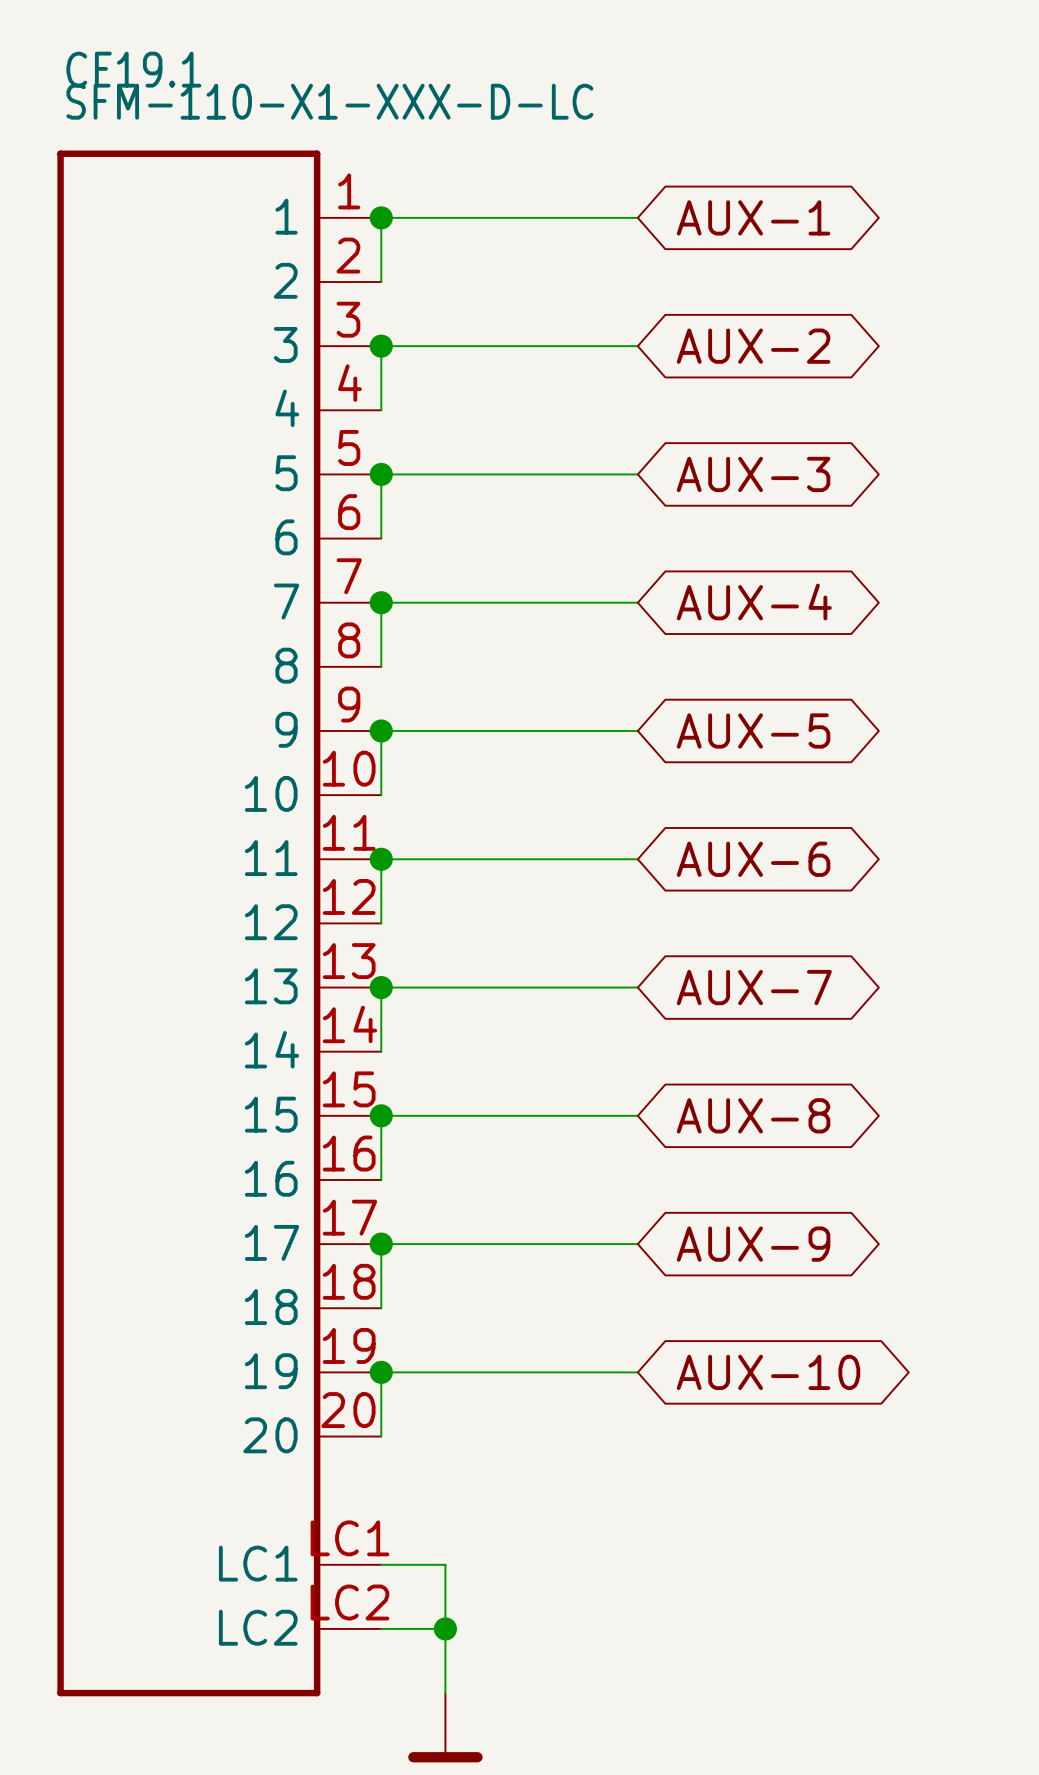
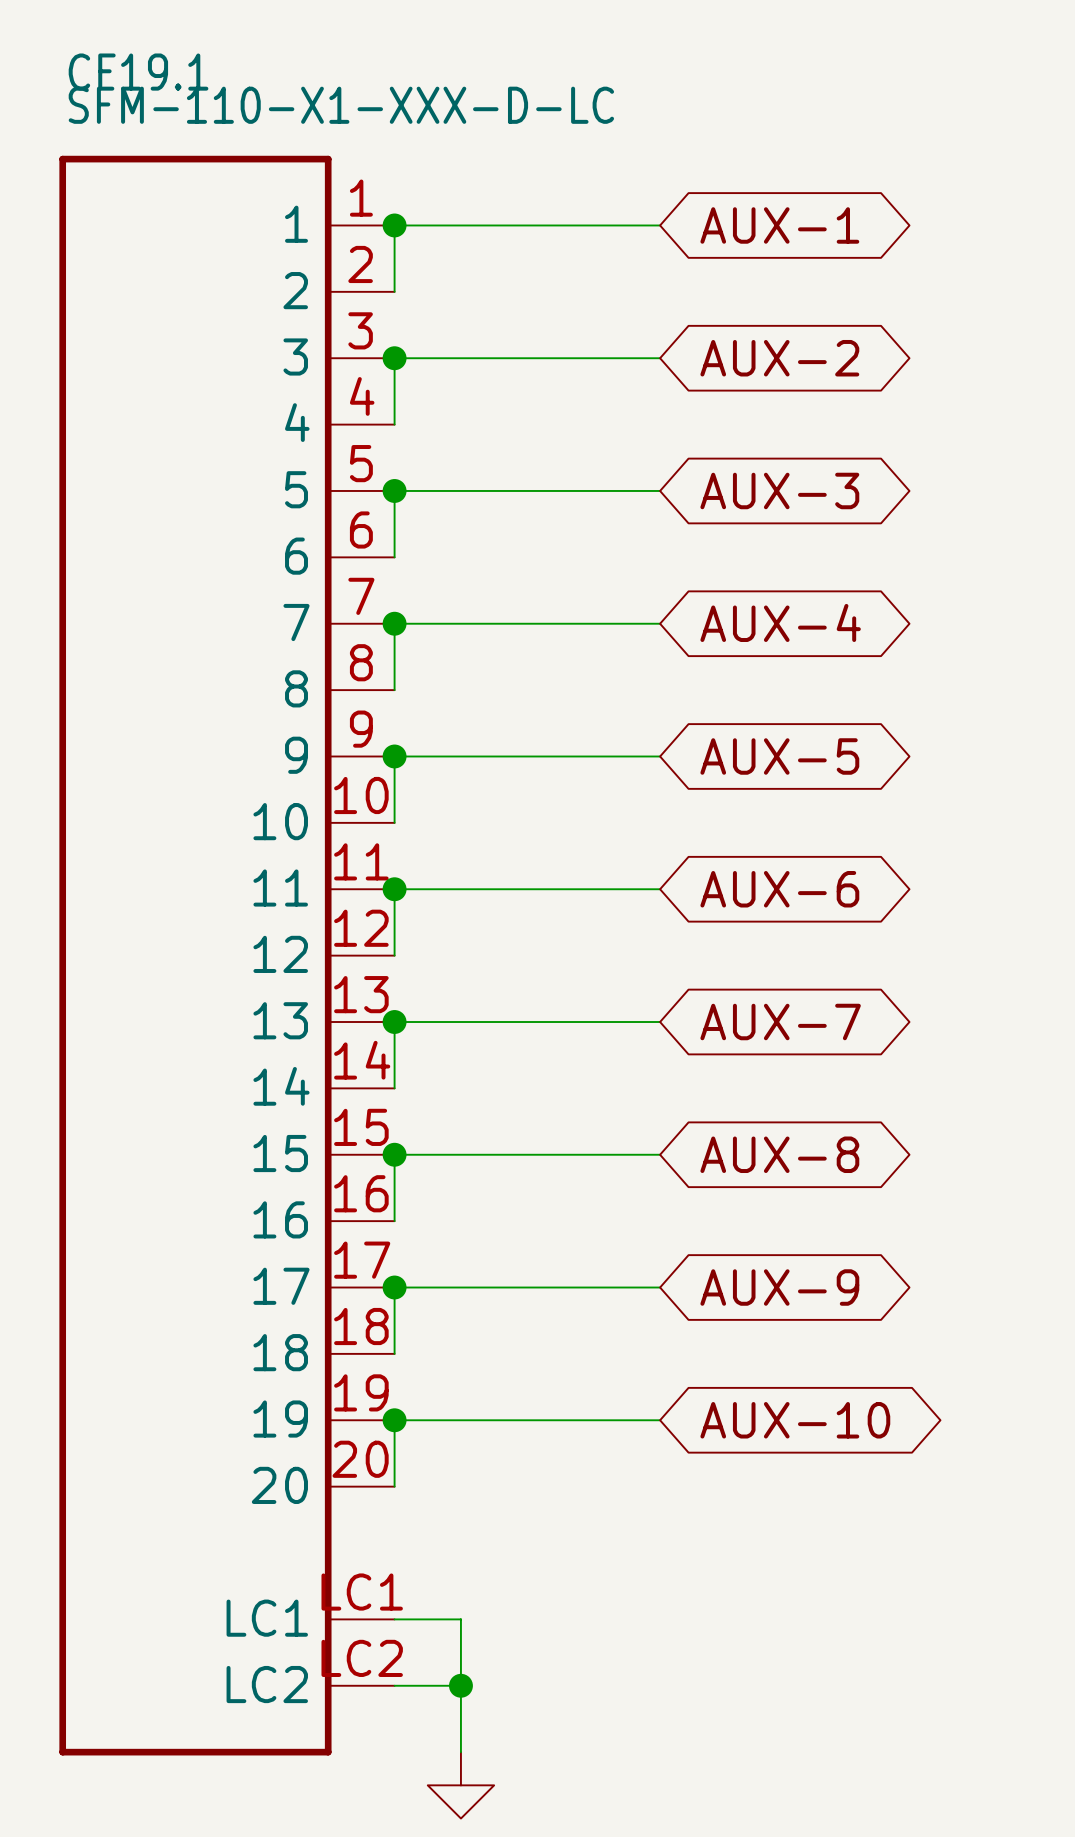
power symbol shape: [408, 1693, 483, 1763] -> [427, 1752, 495, 1819]

